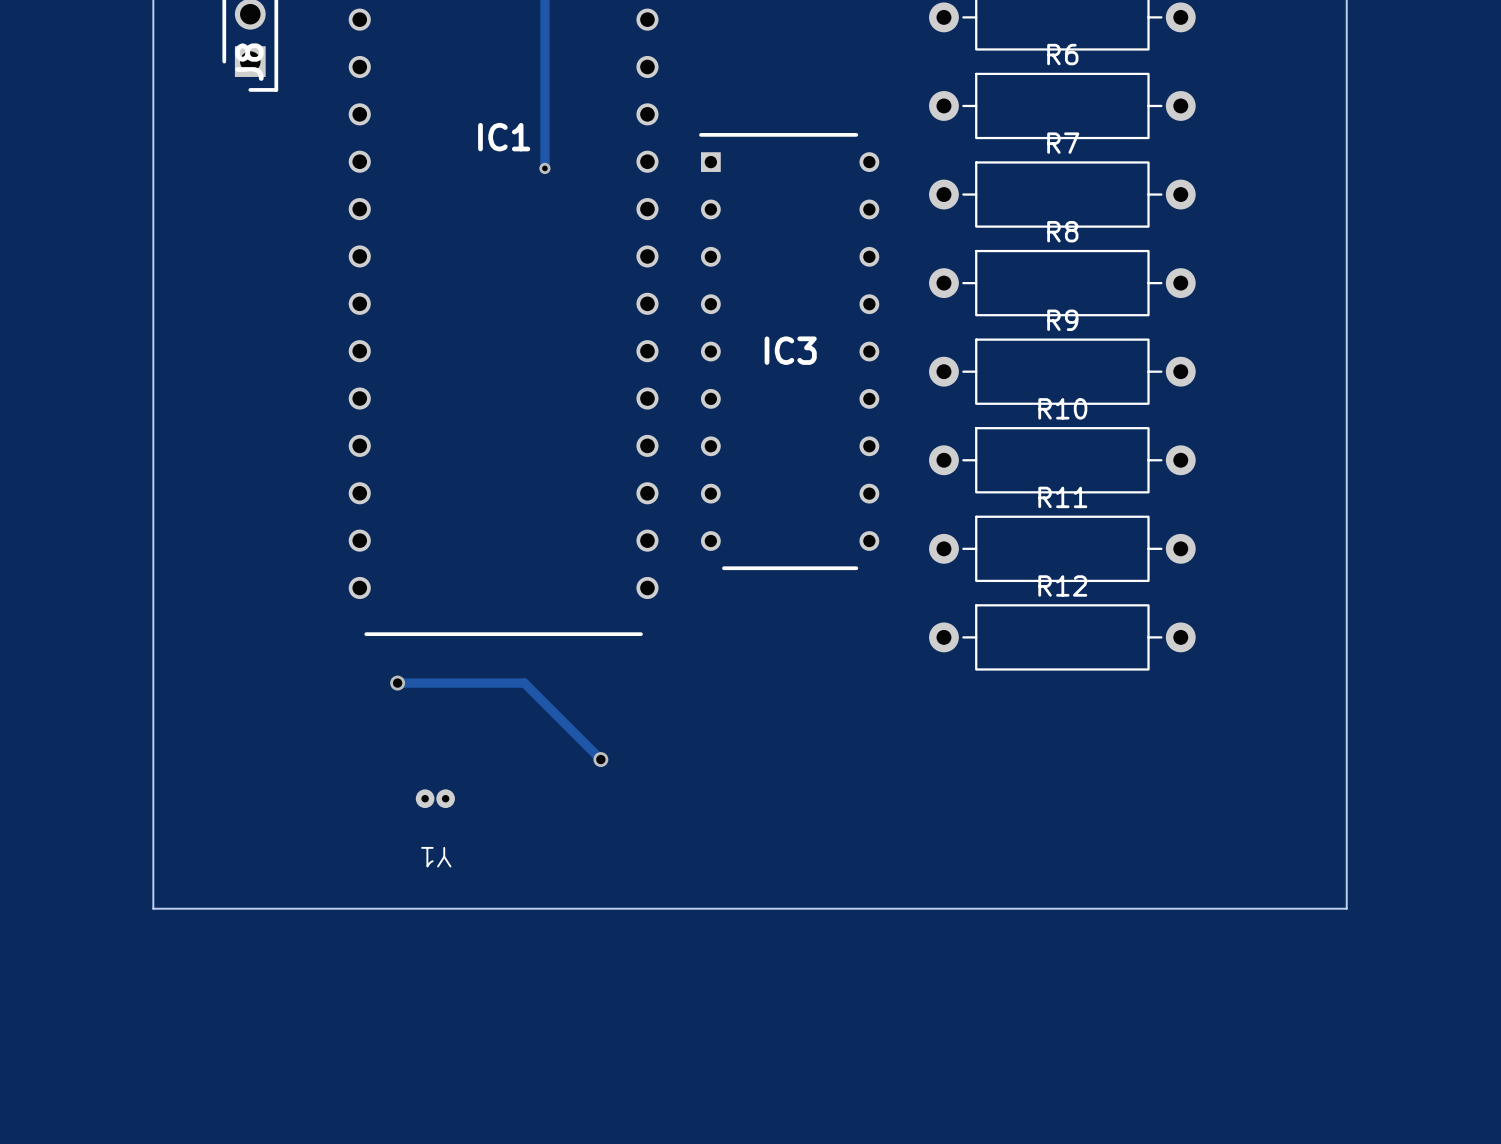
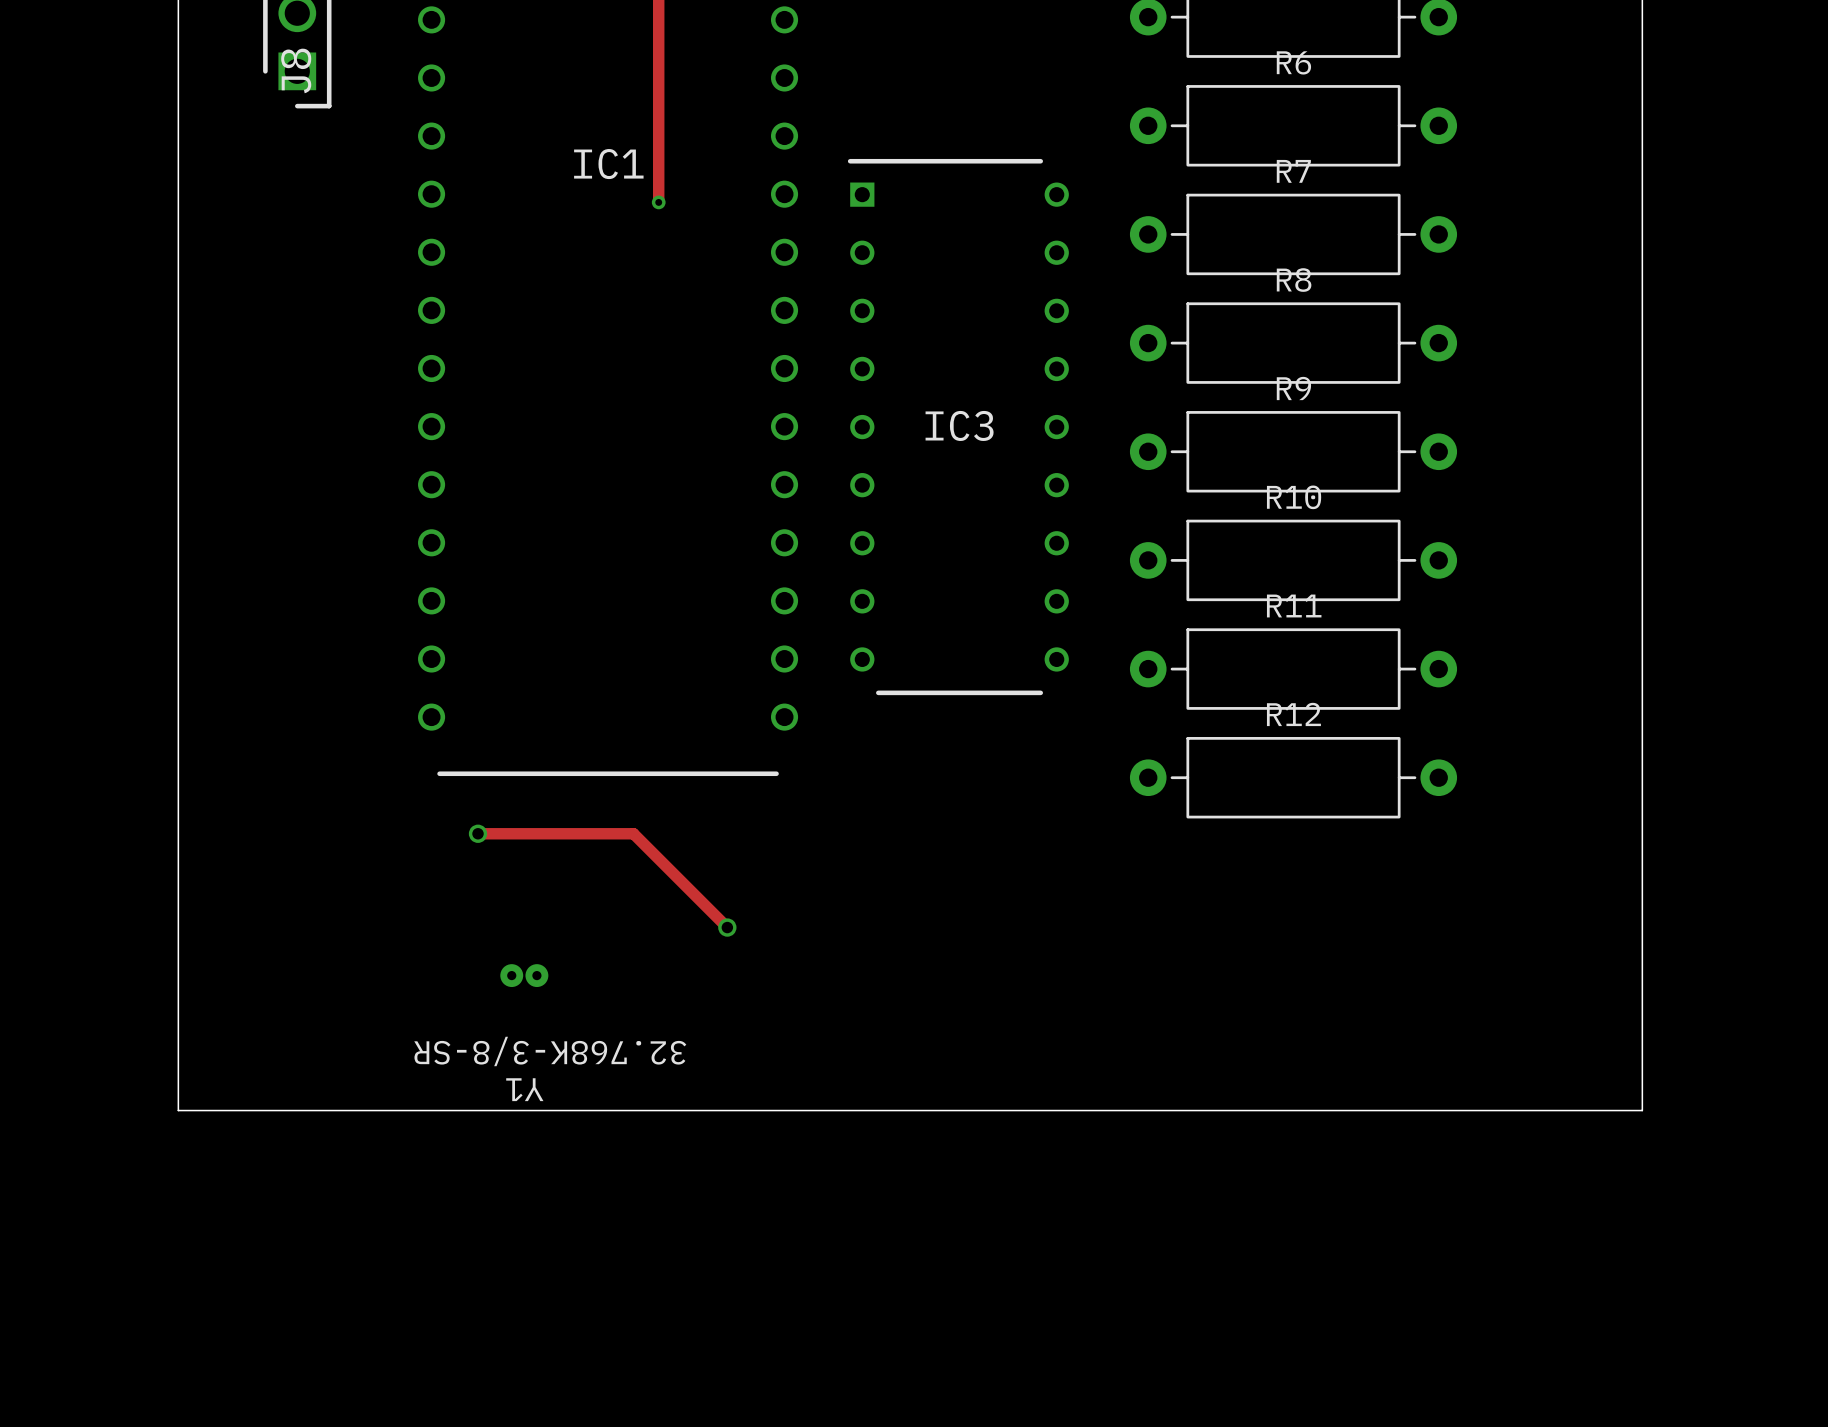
Y1 name position: Y1 (436, 857) -> Y1 (524, 1089)
Y1 text: none -> 32.768K-3/8-SR (550, 1051)

